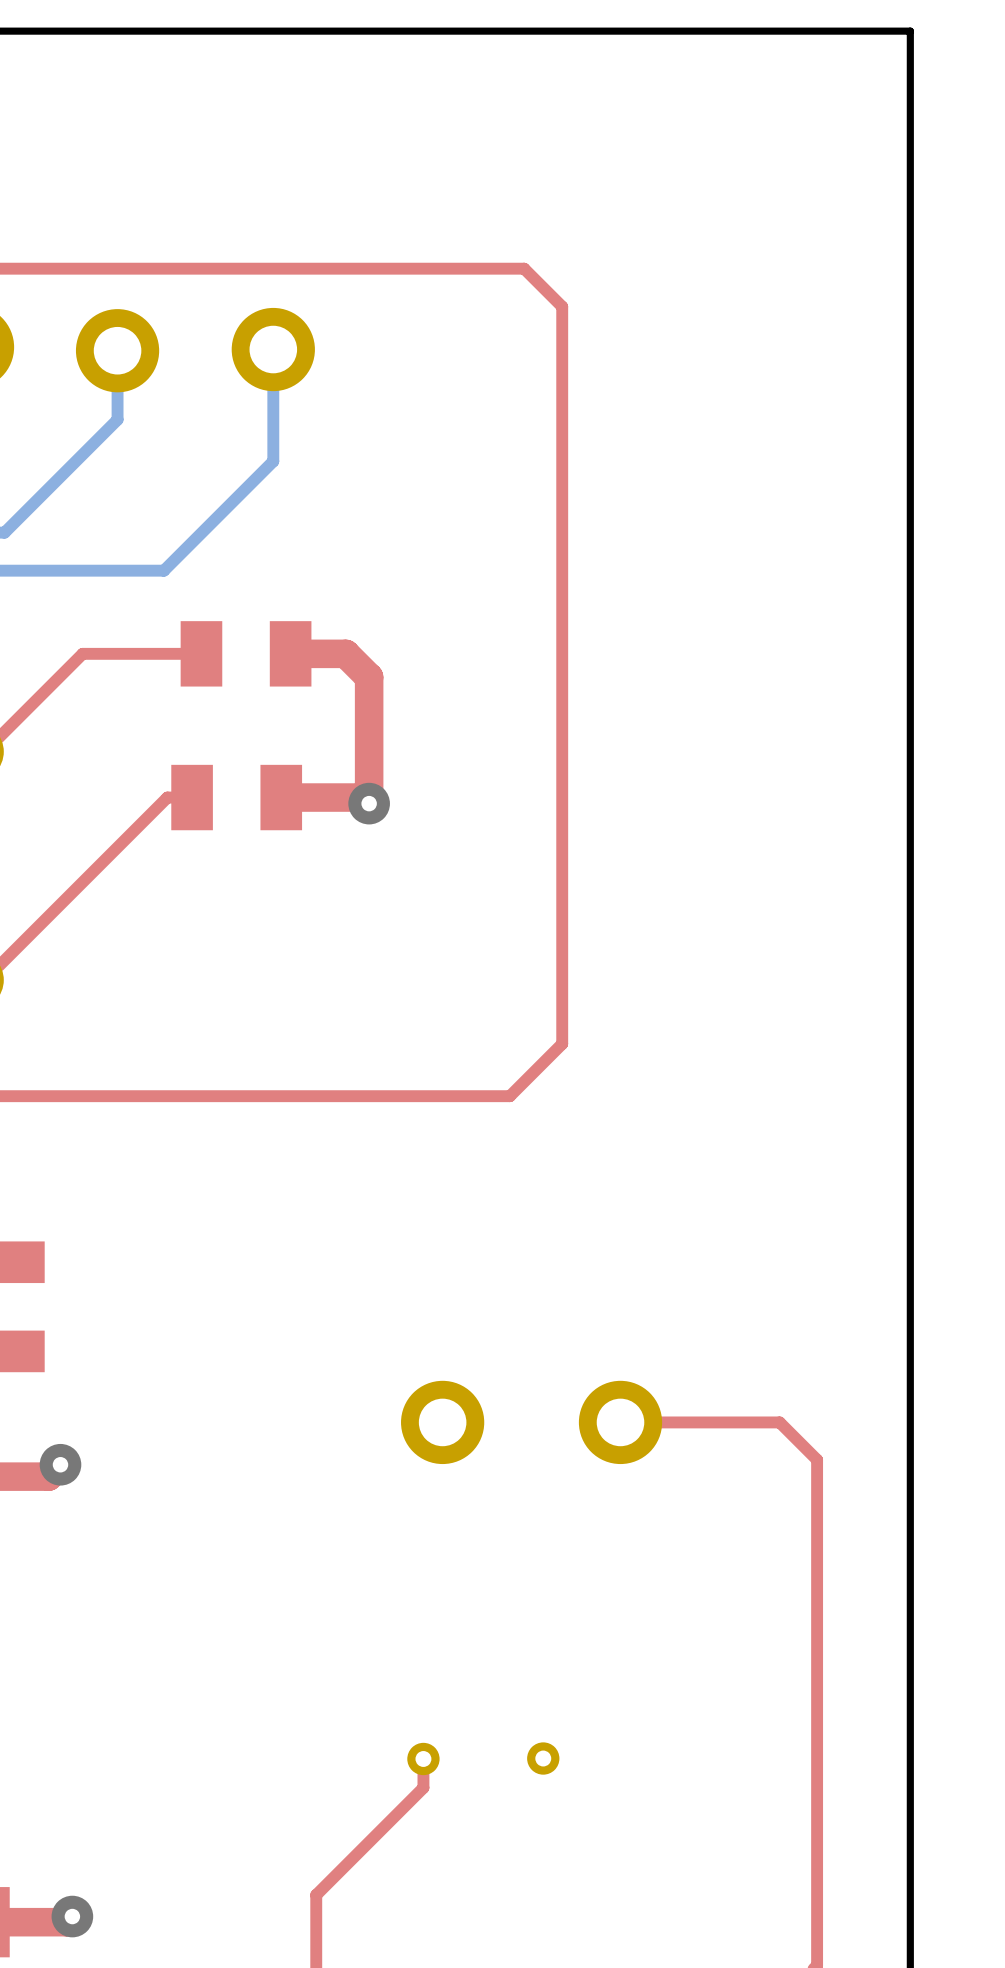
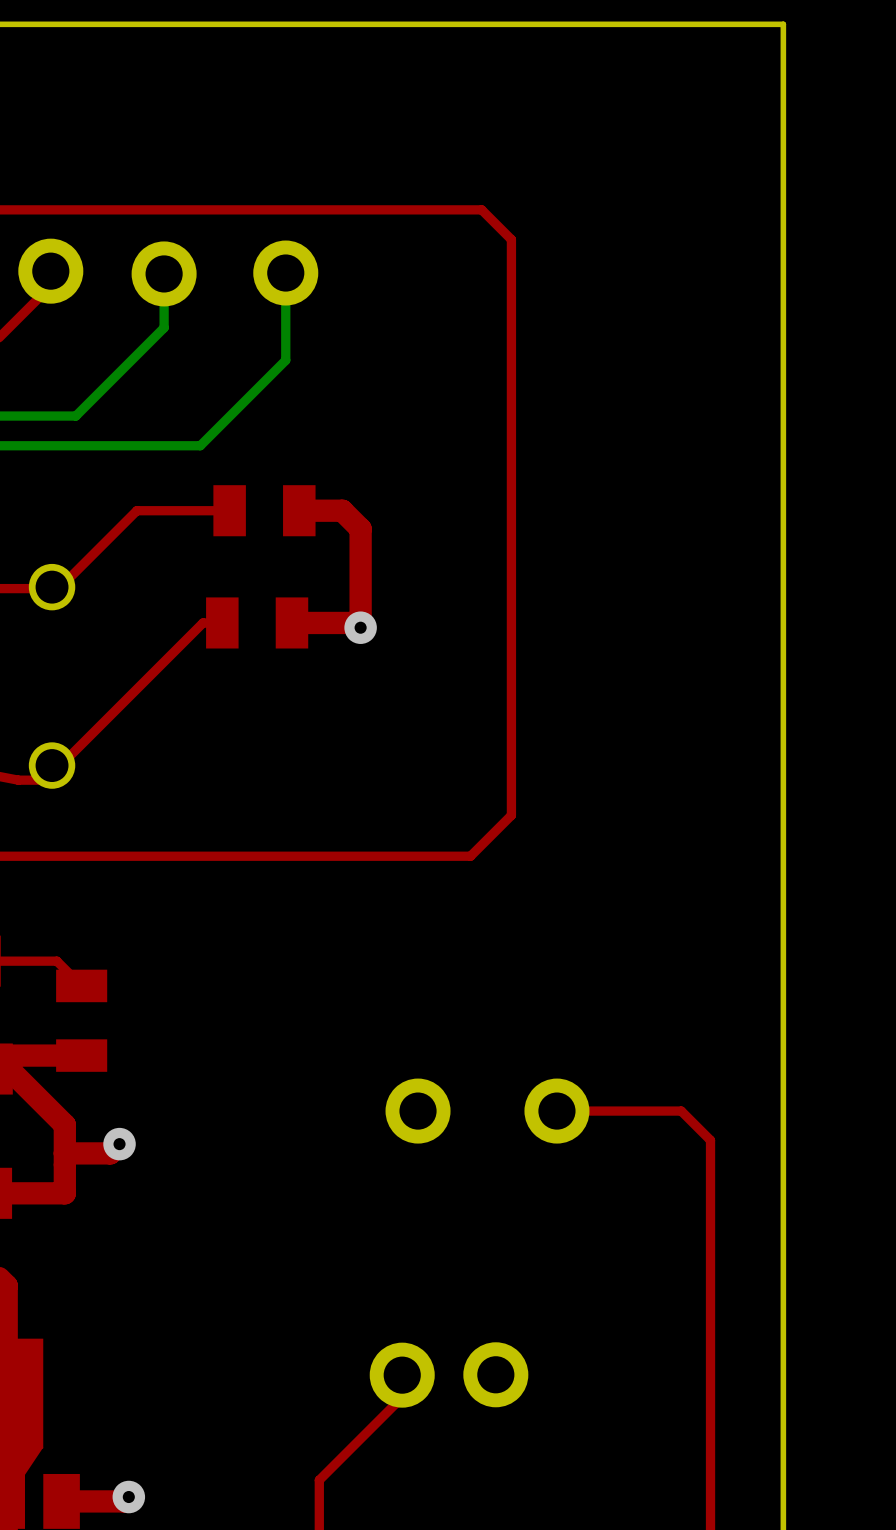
part footprint: [407, 1742, 560, 1776] -> [369, 1342, 529, 1408]

